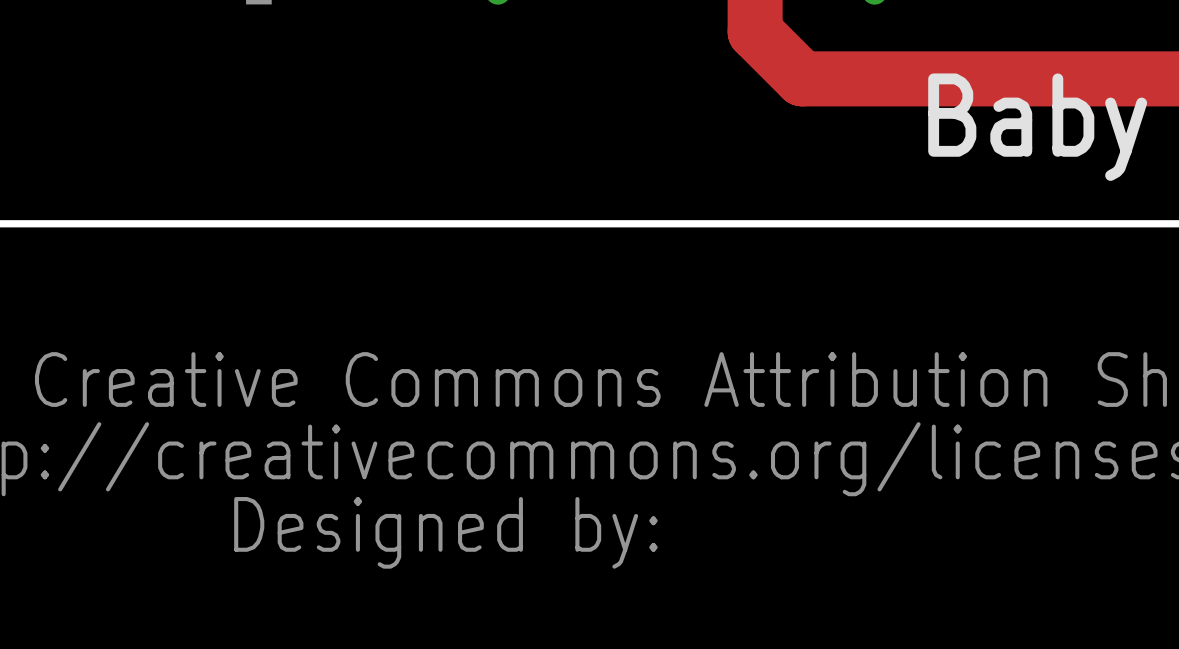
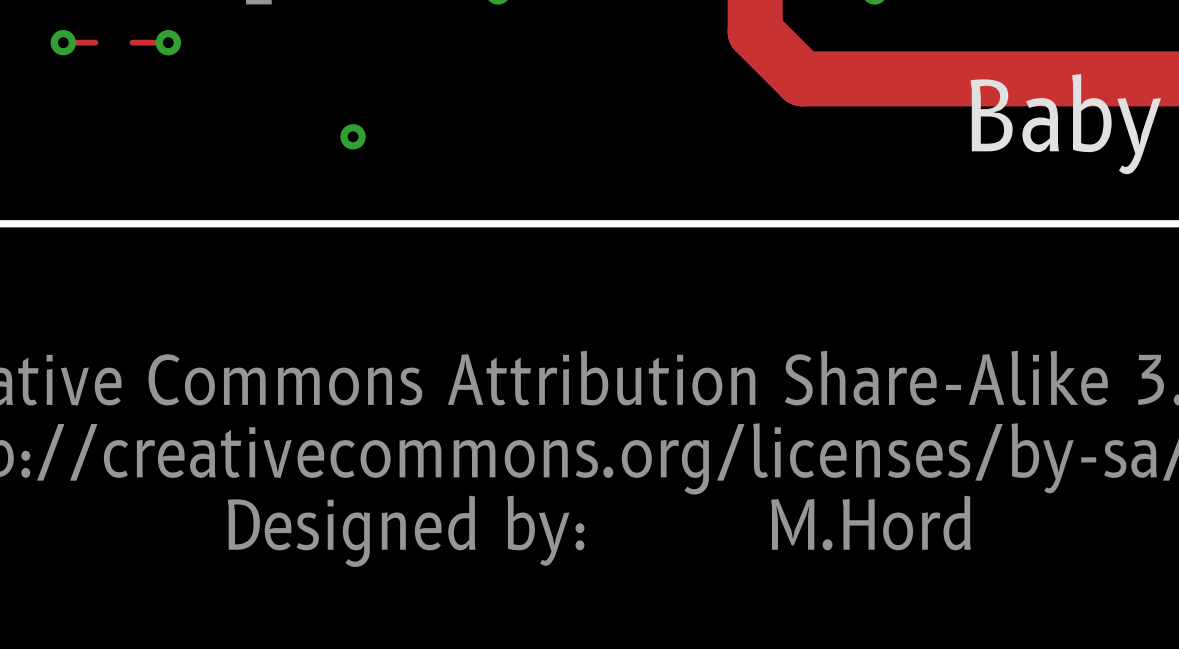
track: none -> (63, 42) (95, 42)
via: none -> (63, 42)
track: none -> (132, 42) (168, 42)
via: none -> (168, 42)
via: none -> (353, 136)
text: none -> M.Hord (870, 523)

